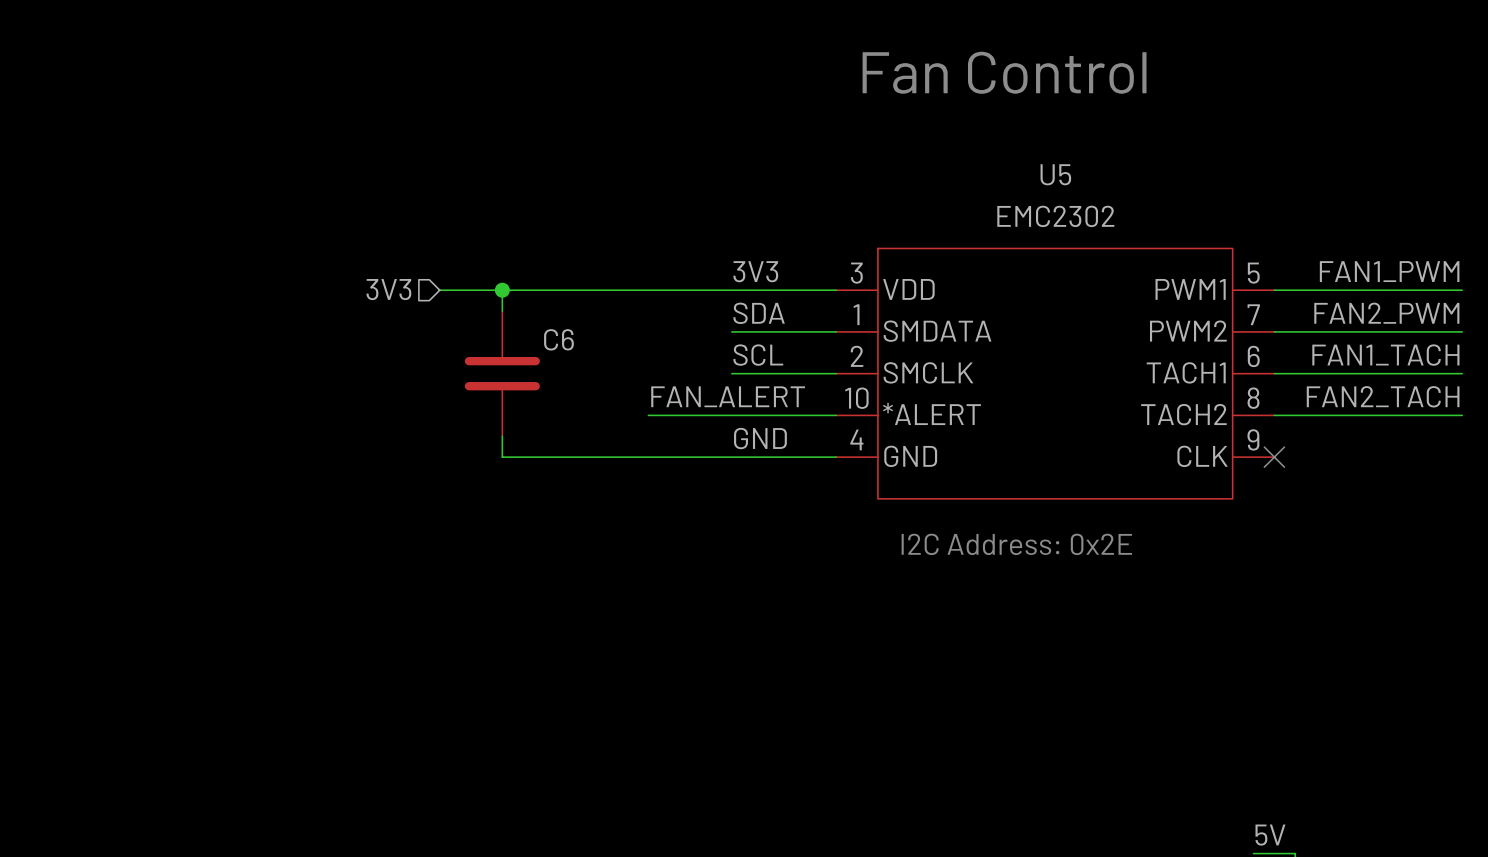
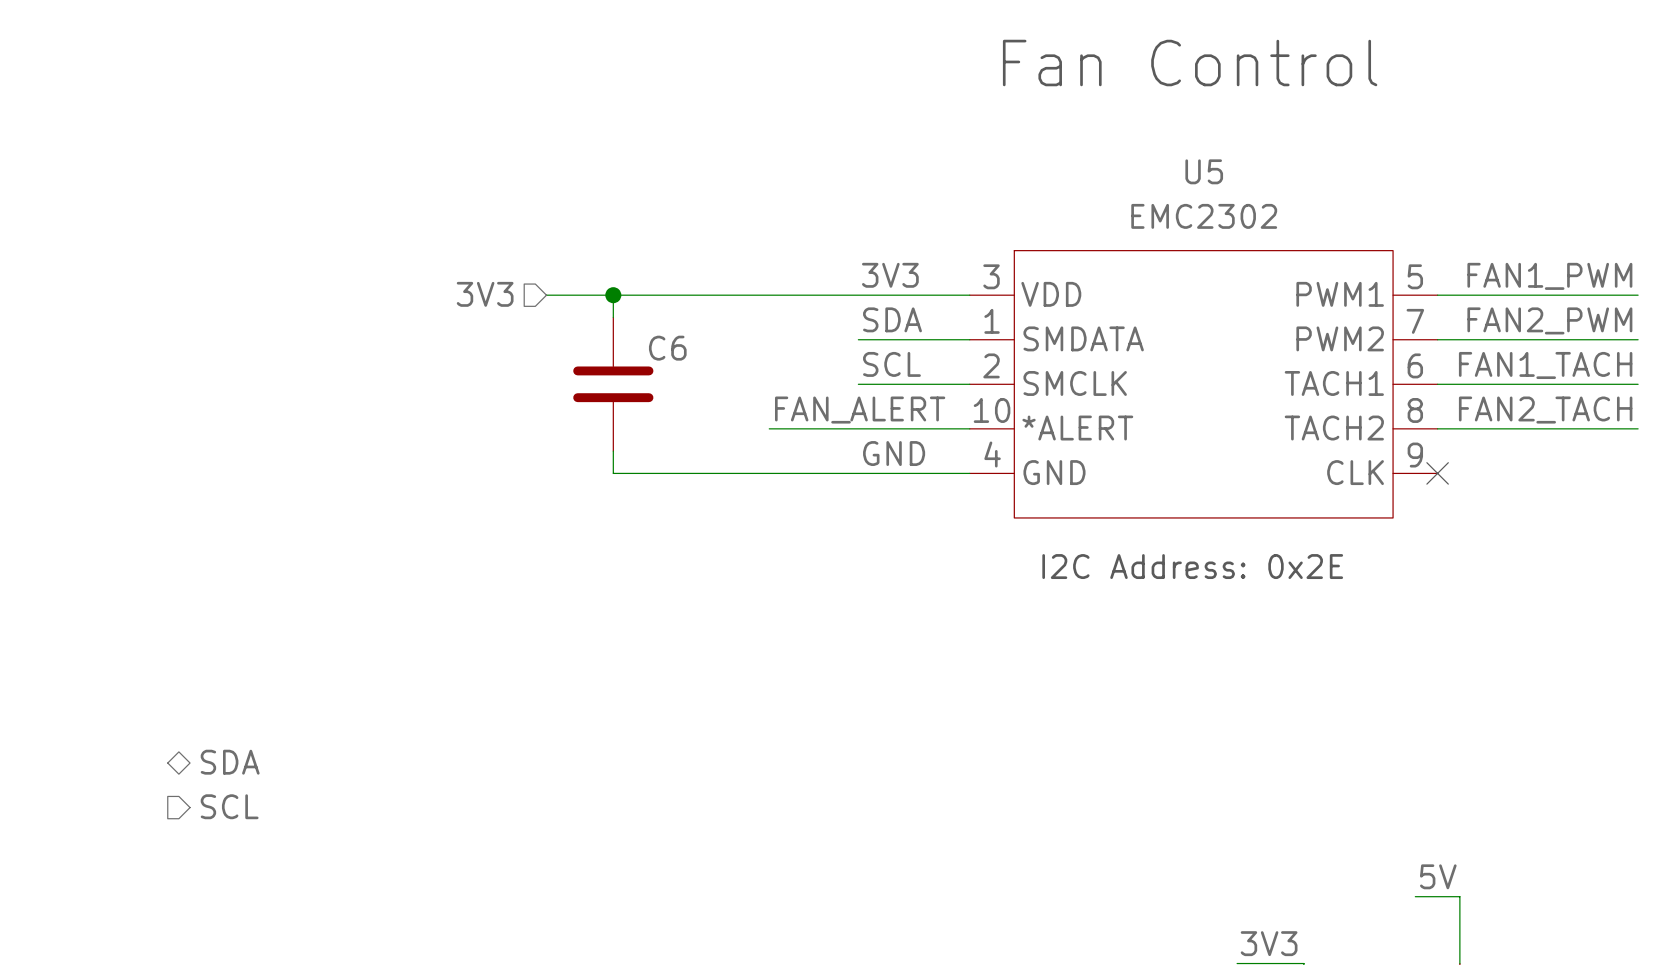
hierarchical label: none -> SDA (230, 762)
hierarchical label: none -> SCL (229, 806)

